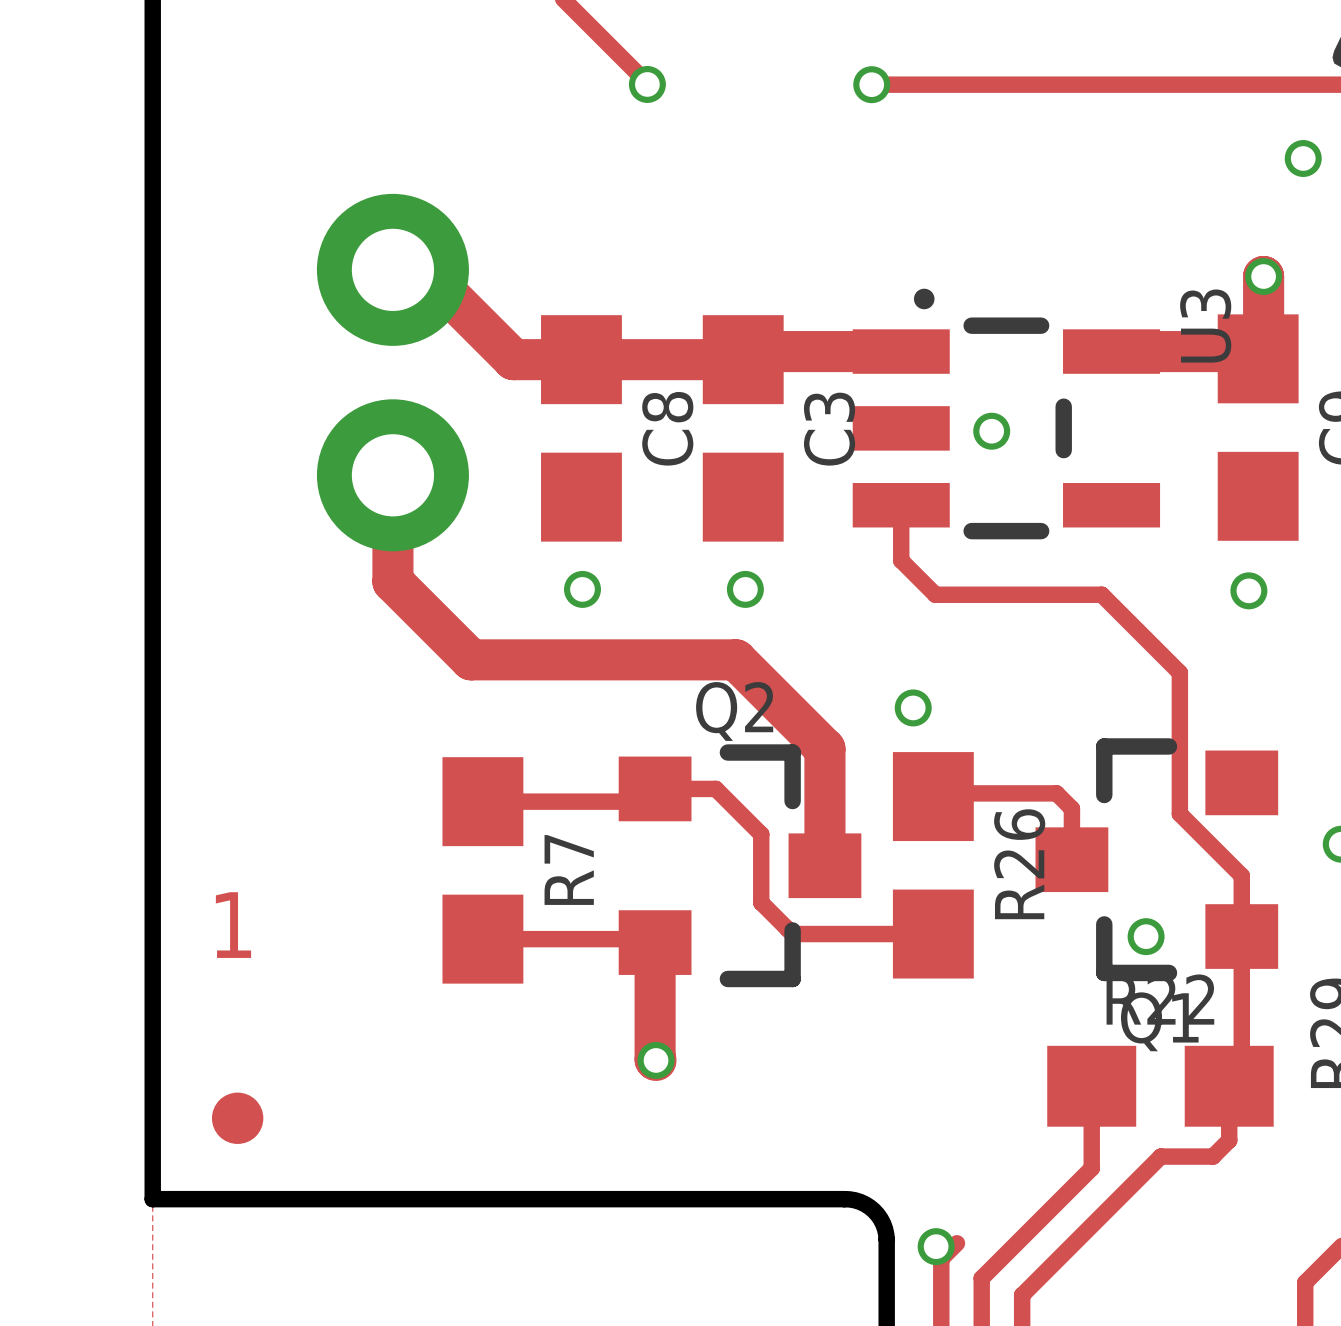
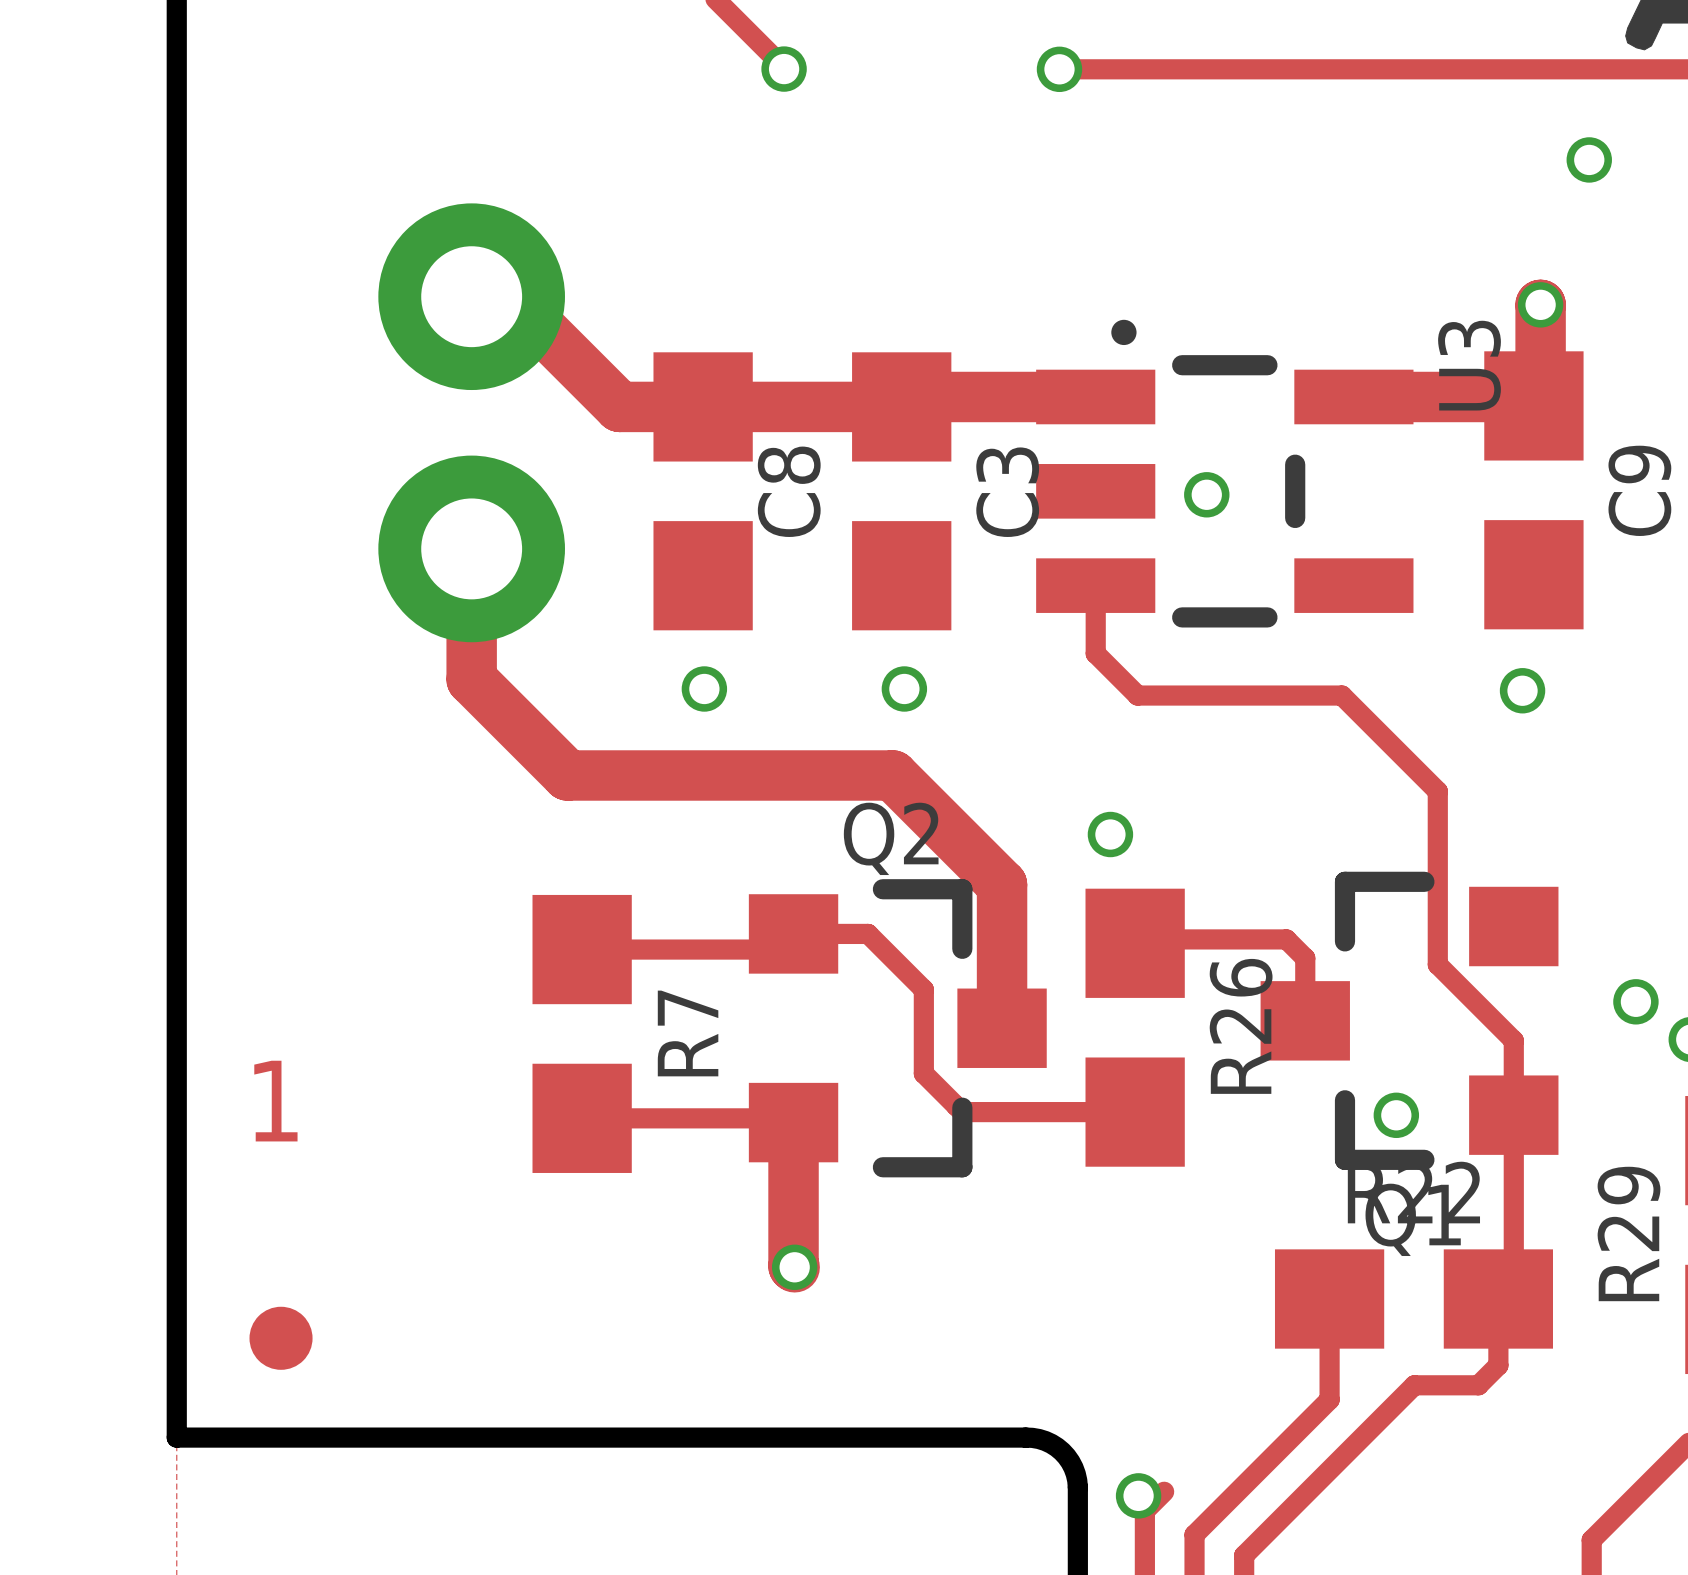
C8 name position: C8 (667, 428) -> C8 (789, 491)

